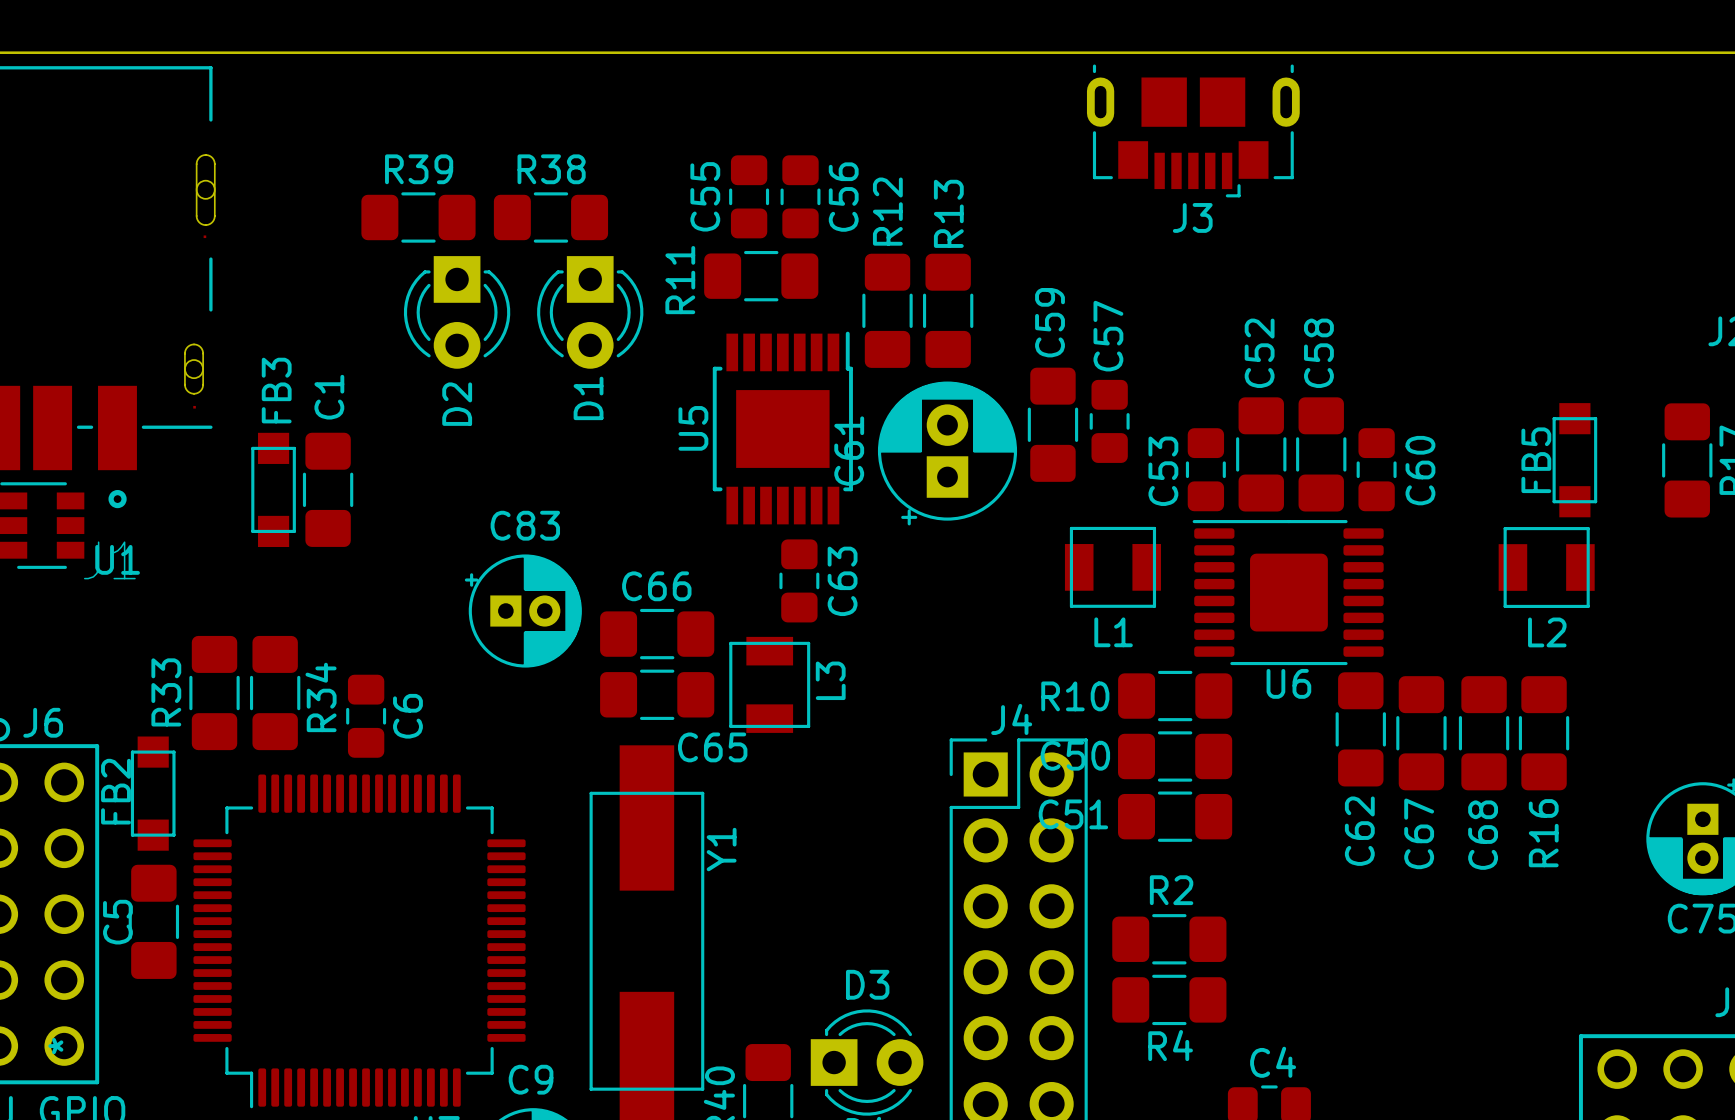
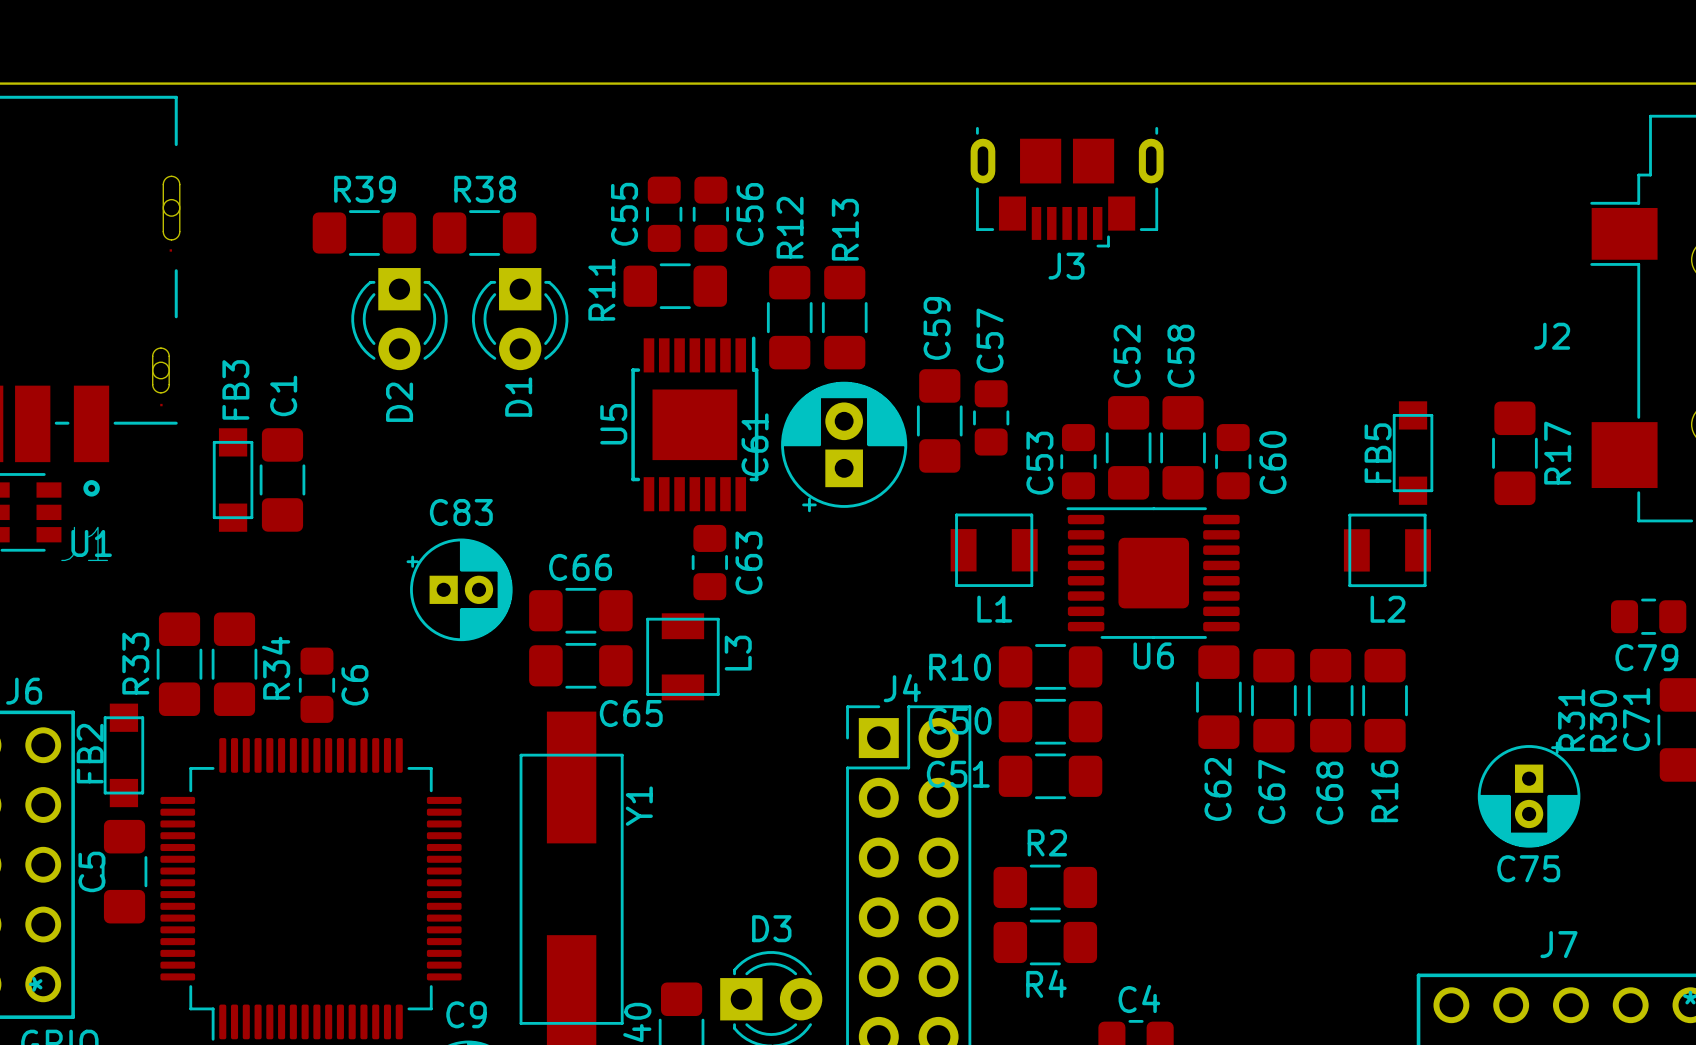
J3 position: (1193, 130) -> (1067, 187)

